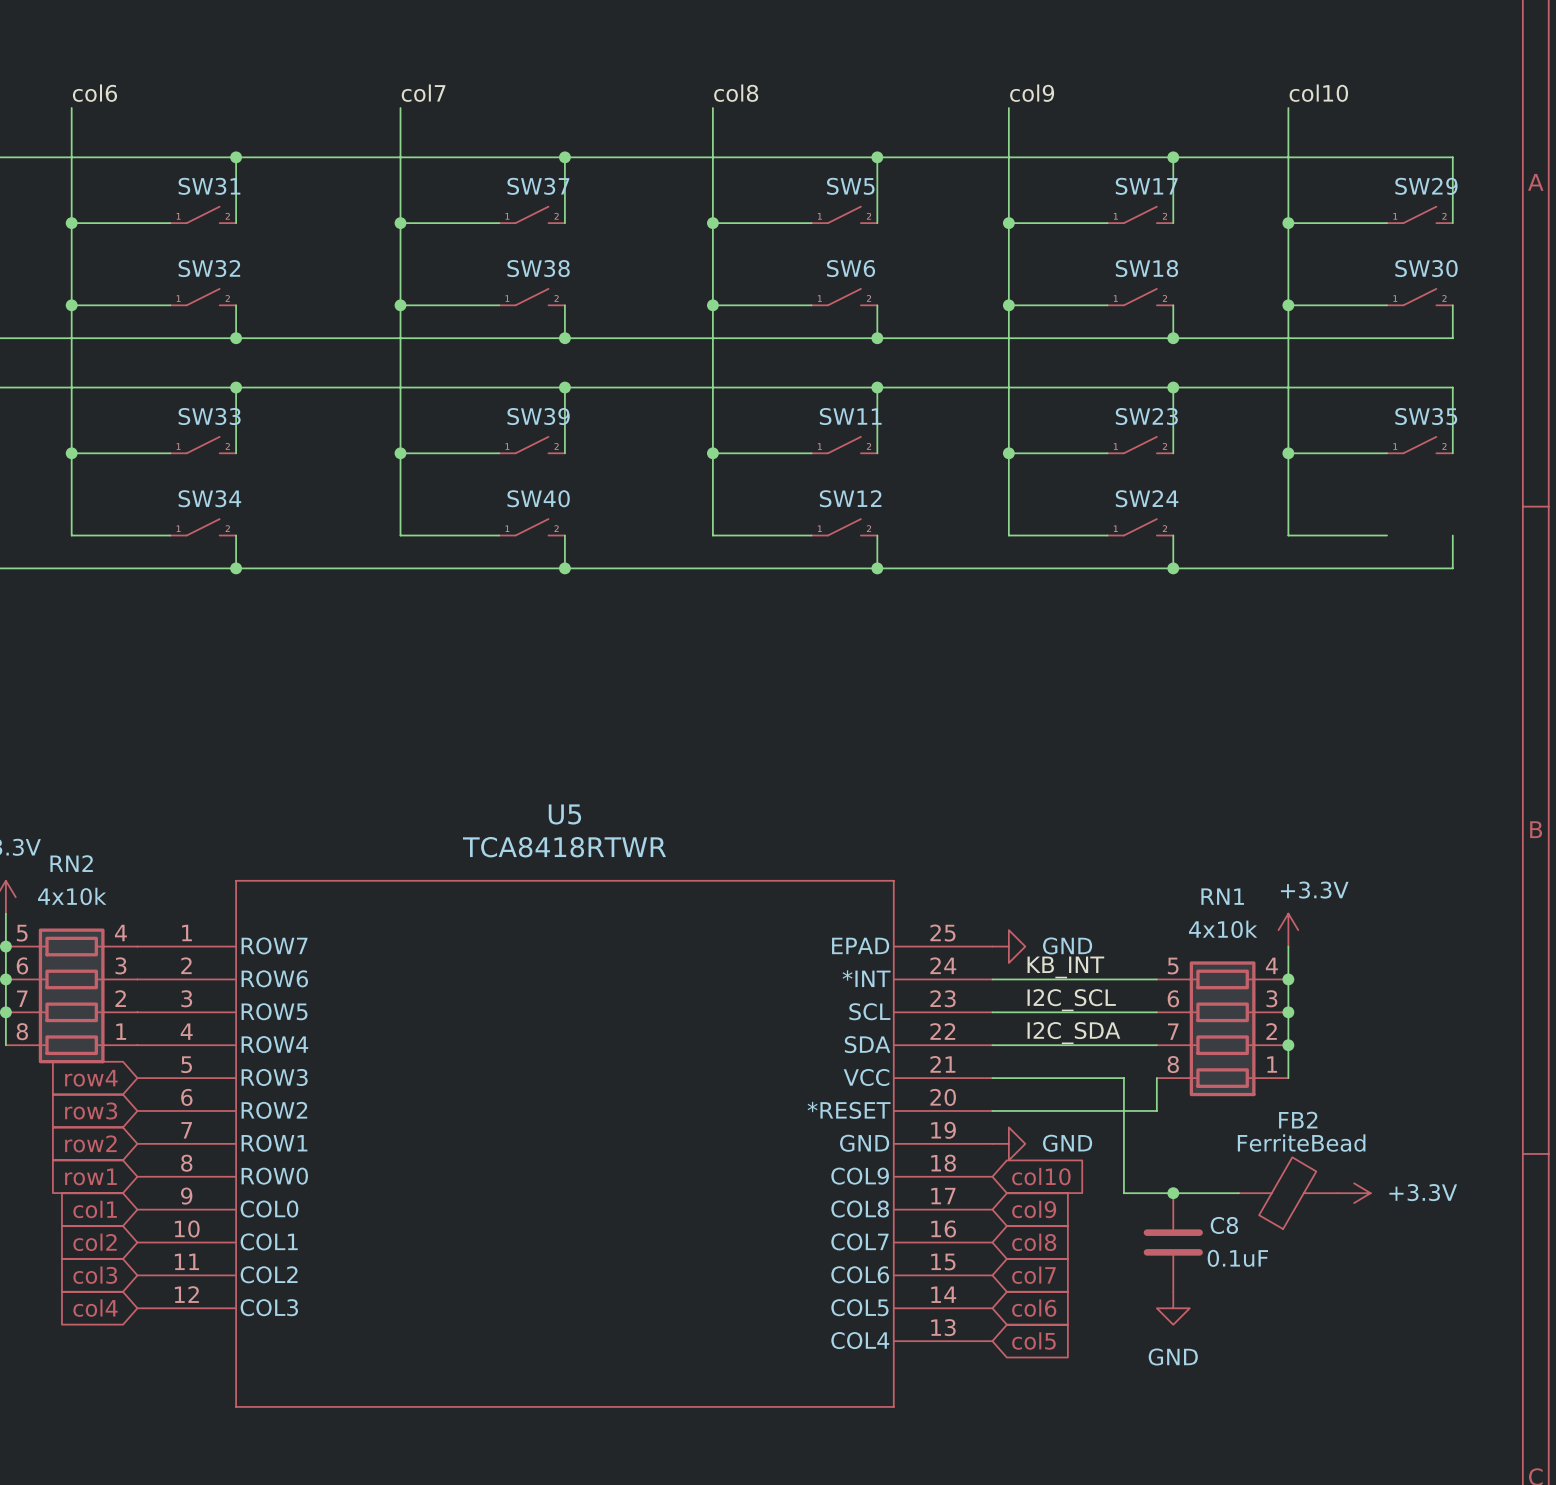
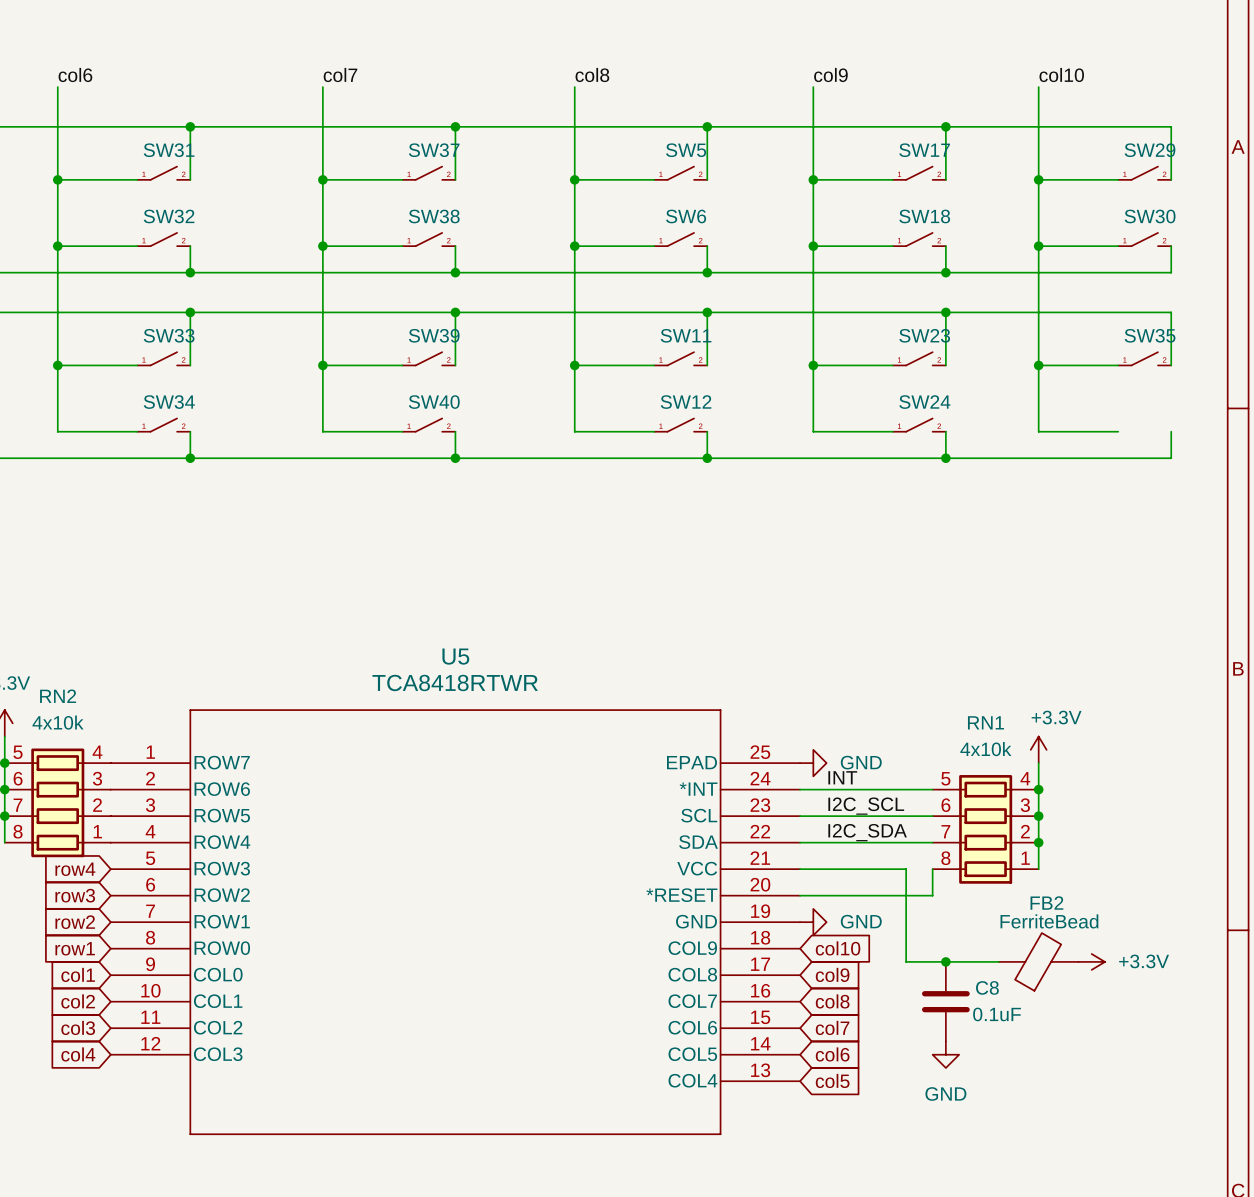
label: KB_INT (1065, 967) -> INT (842, 777)

